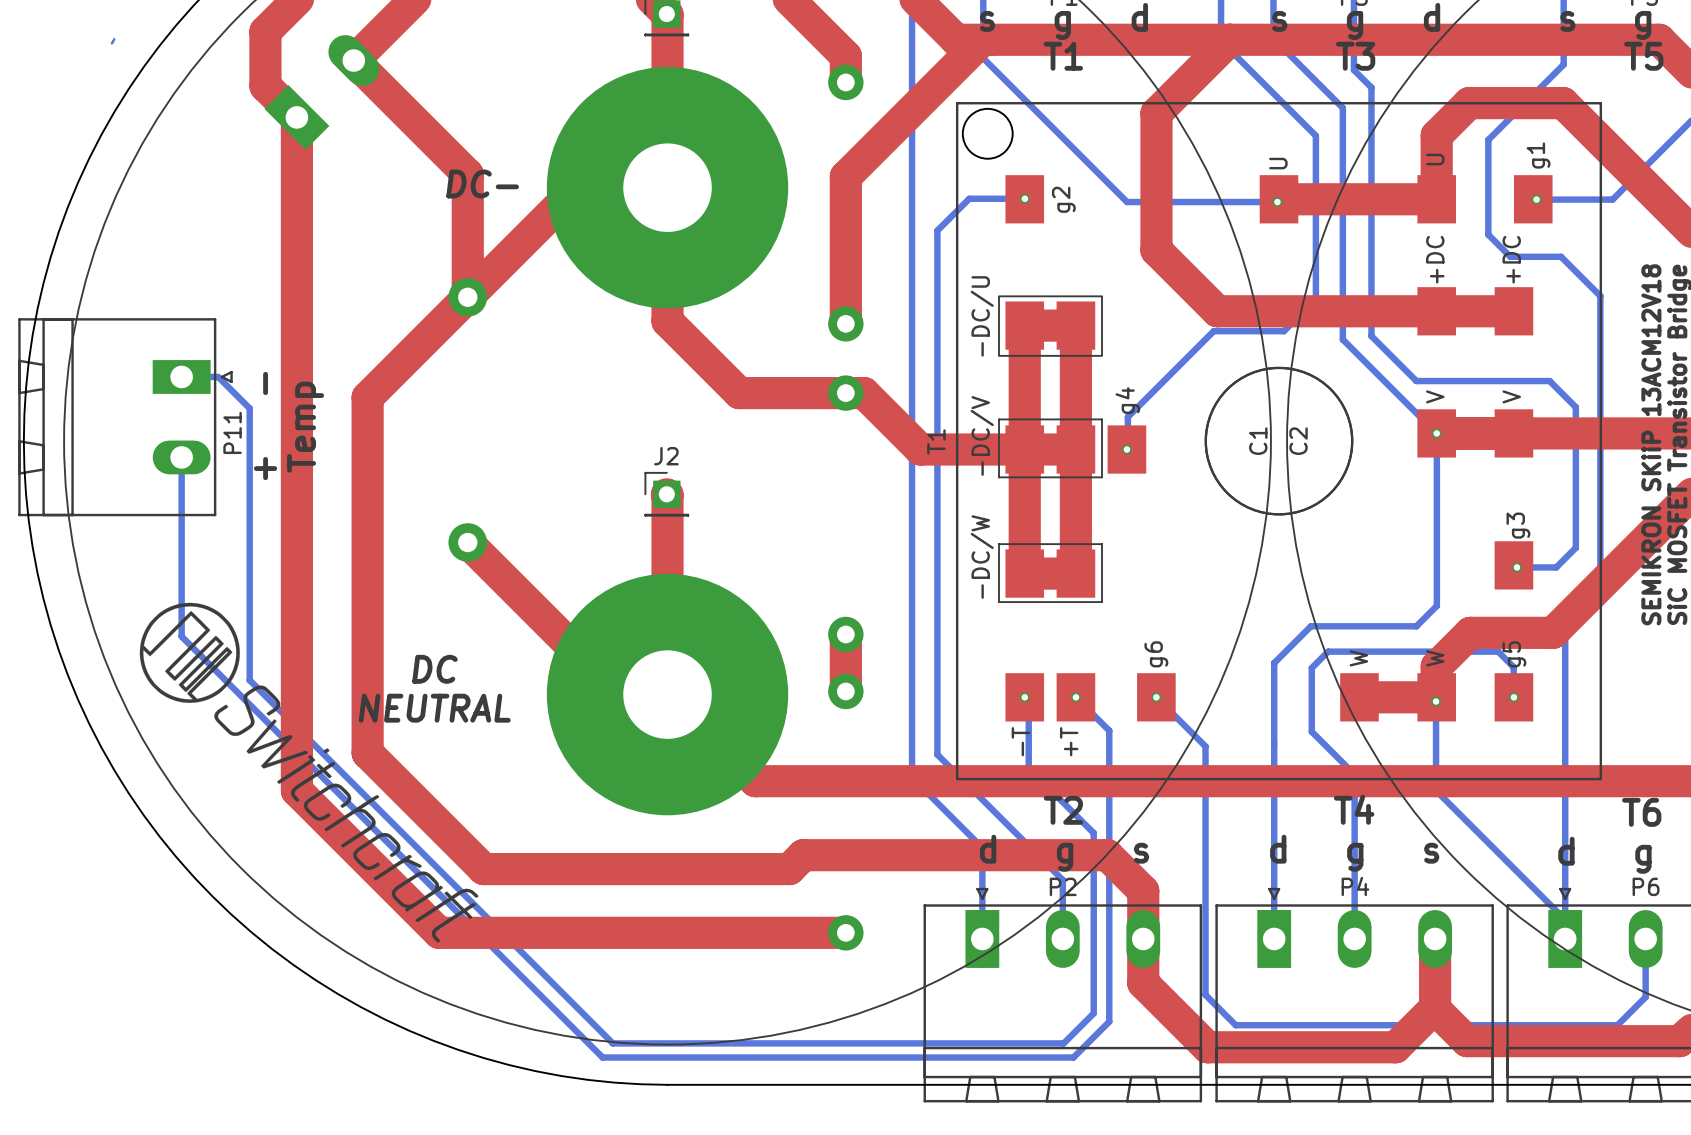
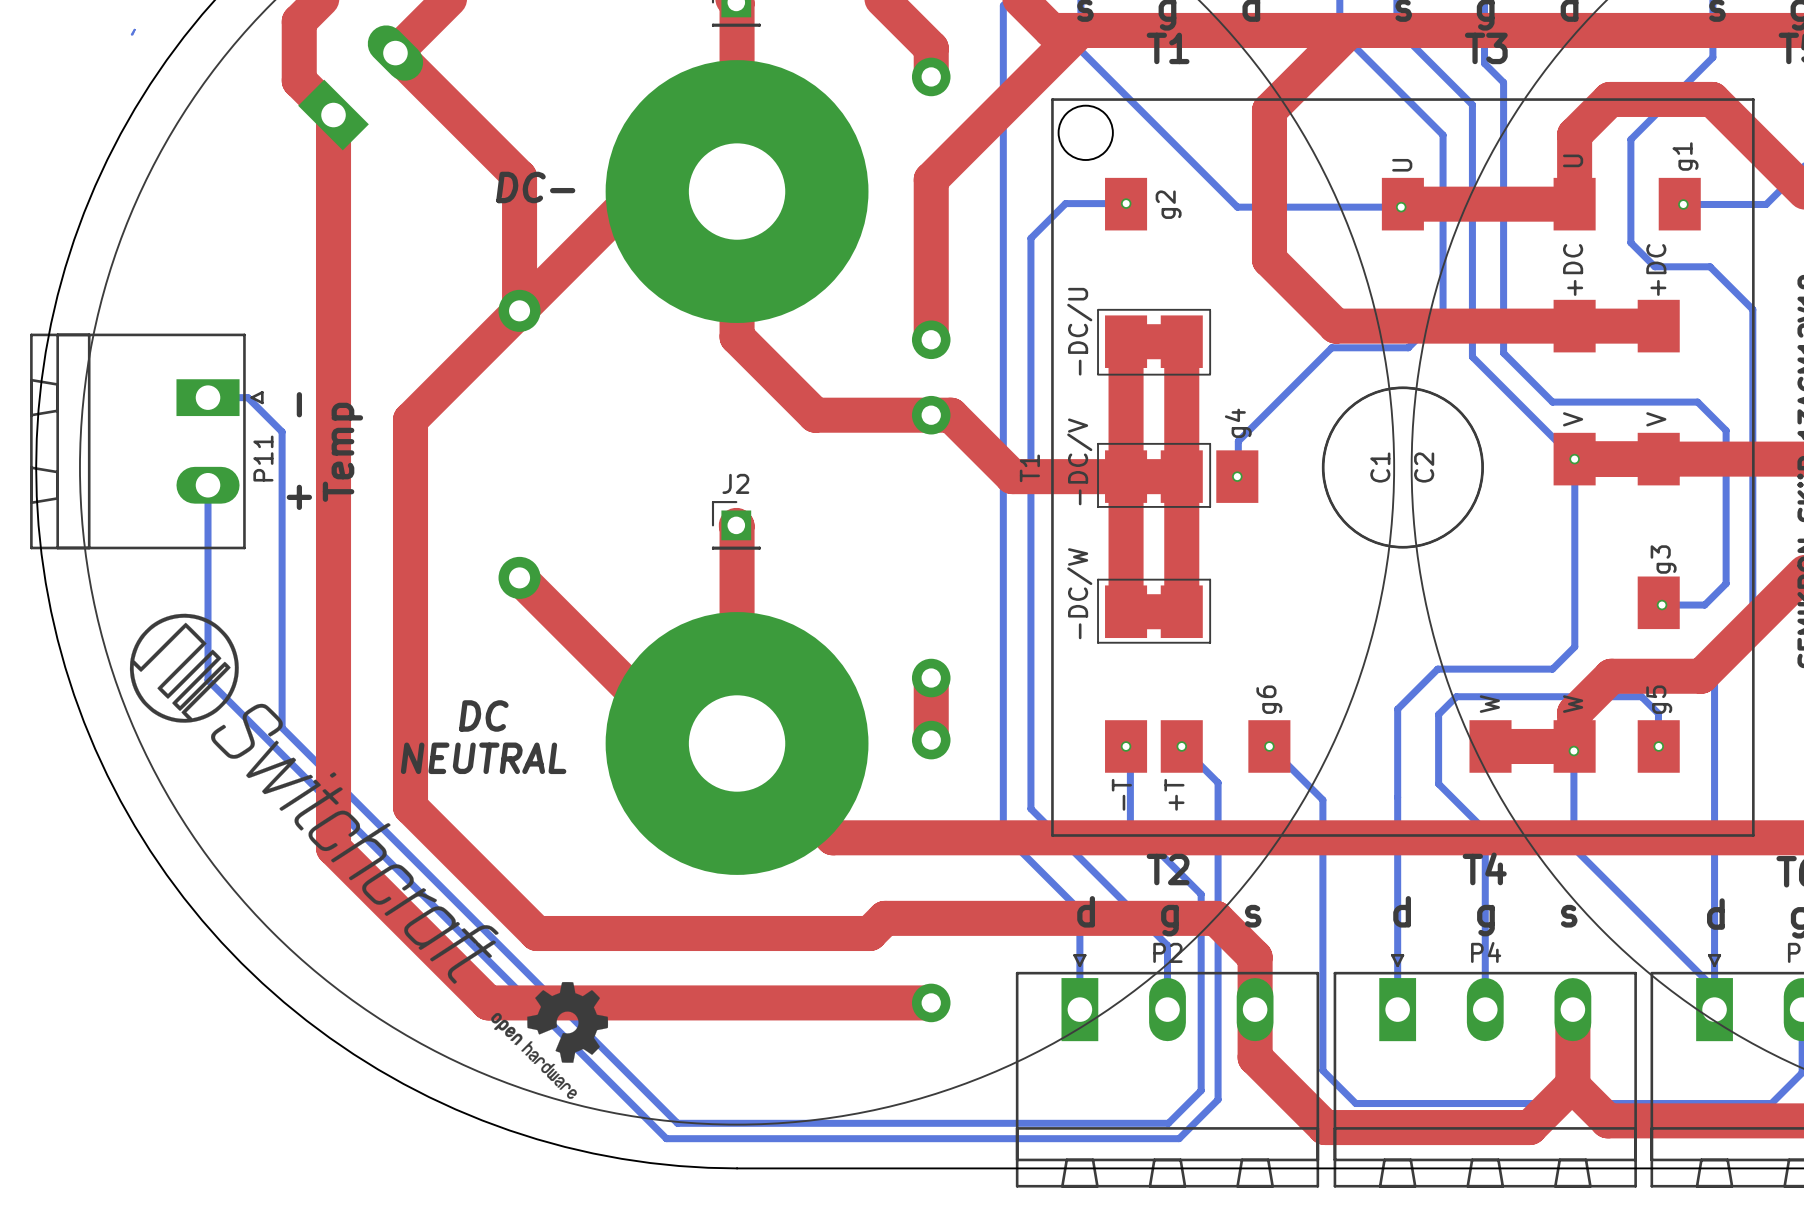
drawing position: (309, 772) -> (314, 798)
drawing: none -> [491, 982, 609, 1099]

